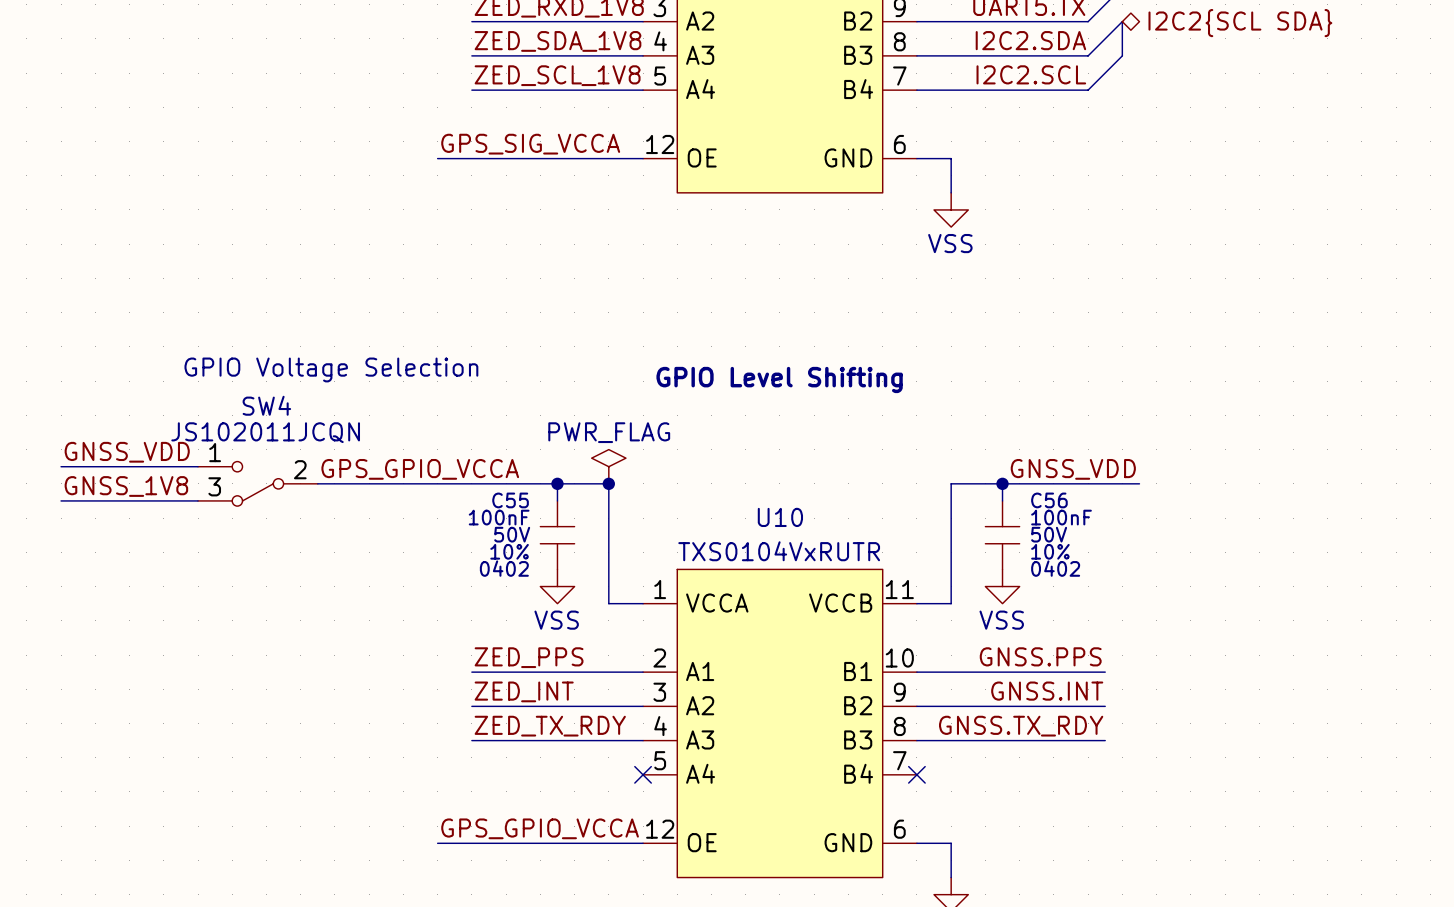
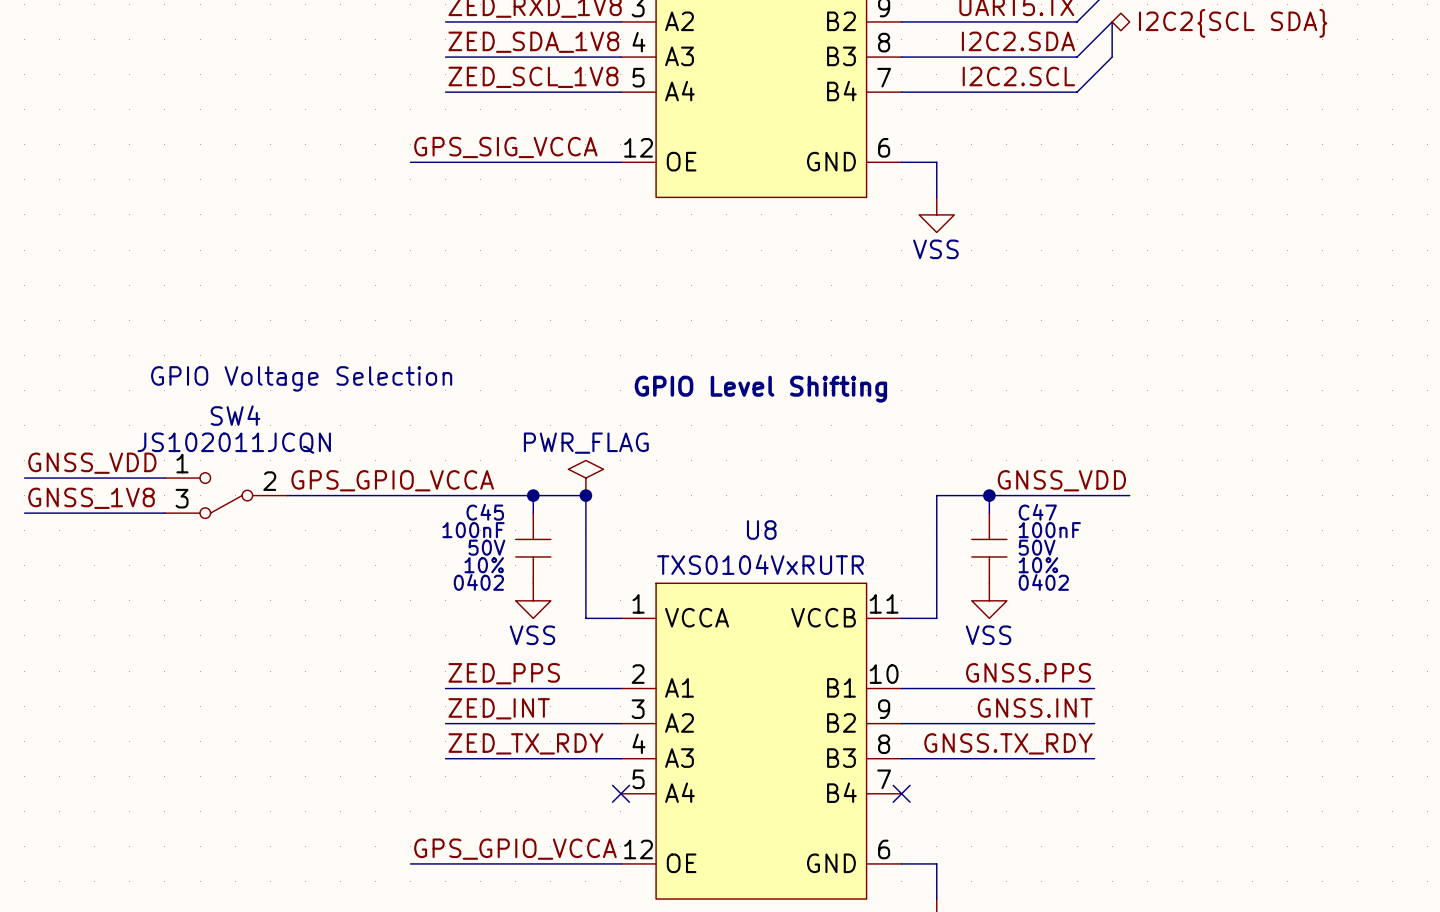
C55 name: C55 (510, 500) -> C45 (485, 512)
C56 name: C56 (1049, 500) -> C47 (1037, 512)
U10 name: U10 (780, 517) -> U8 (761, 530)

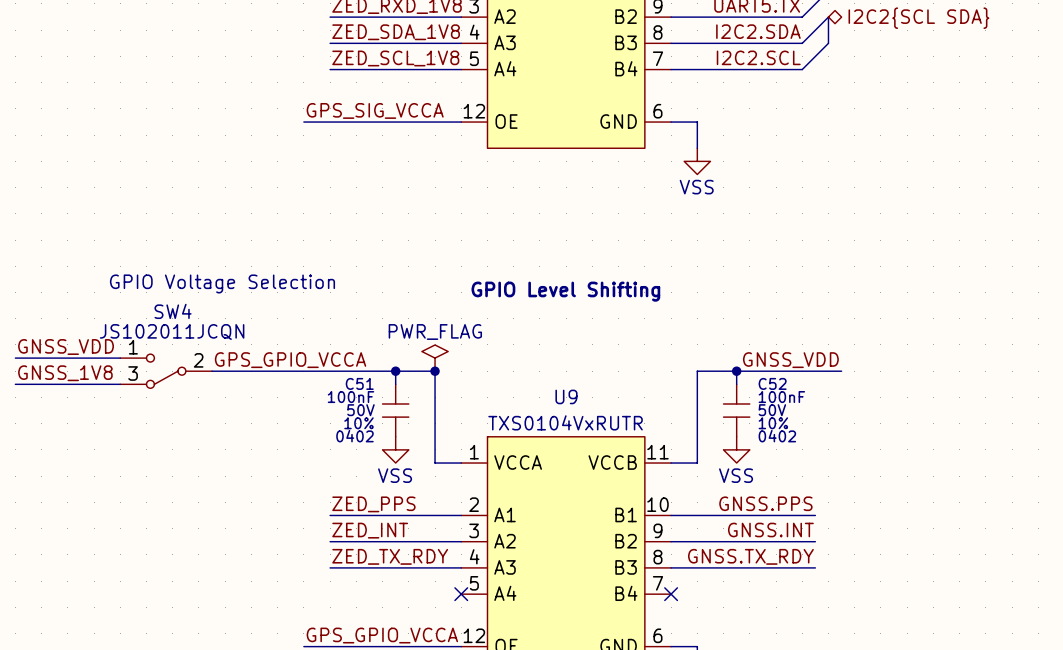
C45 name: C45 (485, 512) -> C51 (359, 383)
C47 name: C47 (1037, 512) -> C52 (772, 383)
U8 name: U8 (761, 530) -> U9 (566, 396)

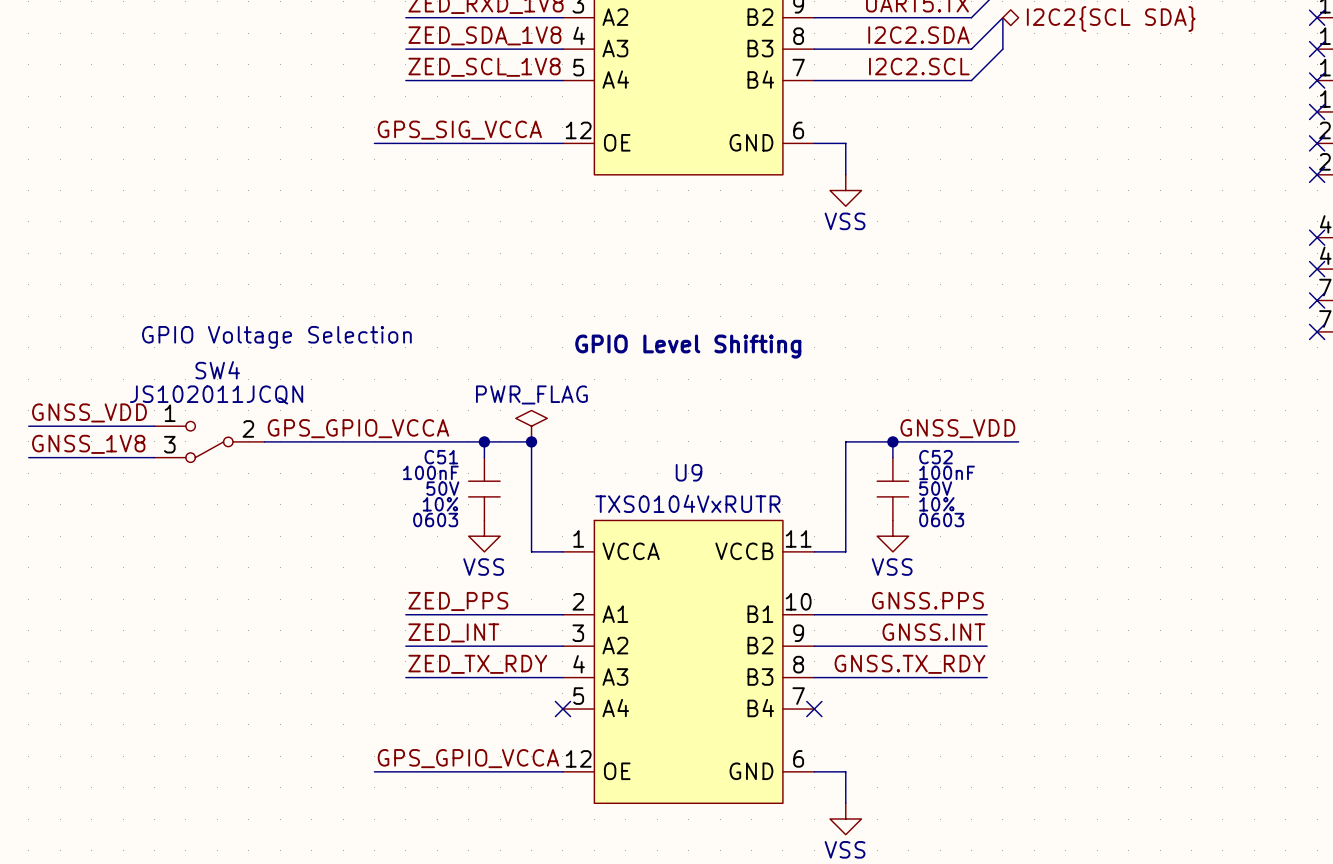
C51 text: 0402 (354, 436) -> 0603 (435, 520)
C52 text: 0402 (777, 436) -> 0603 (941, 520)

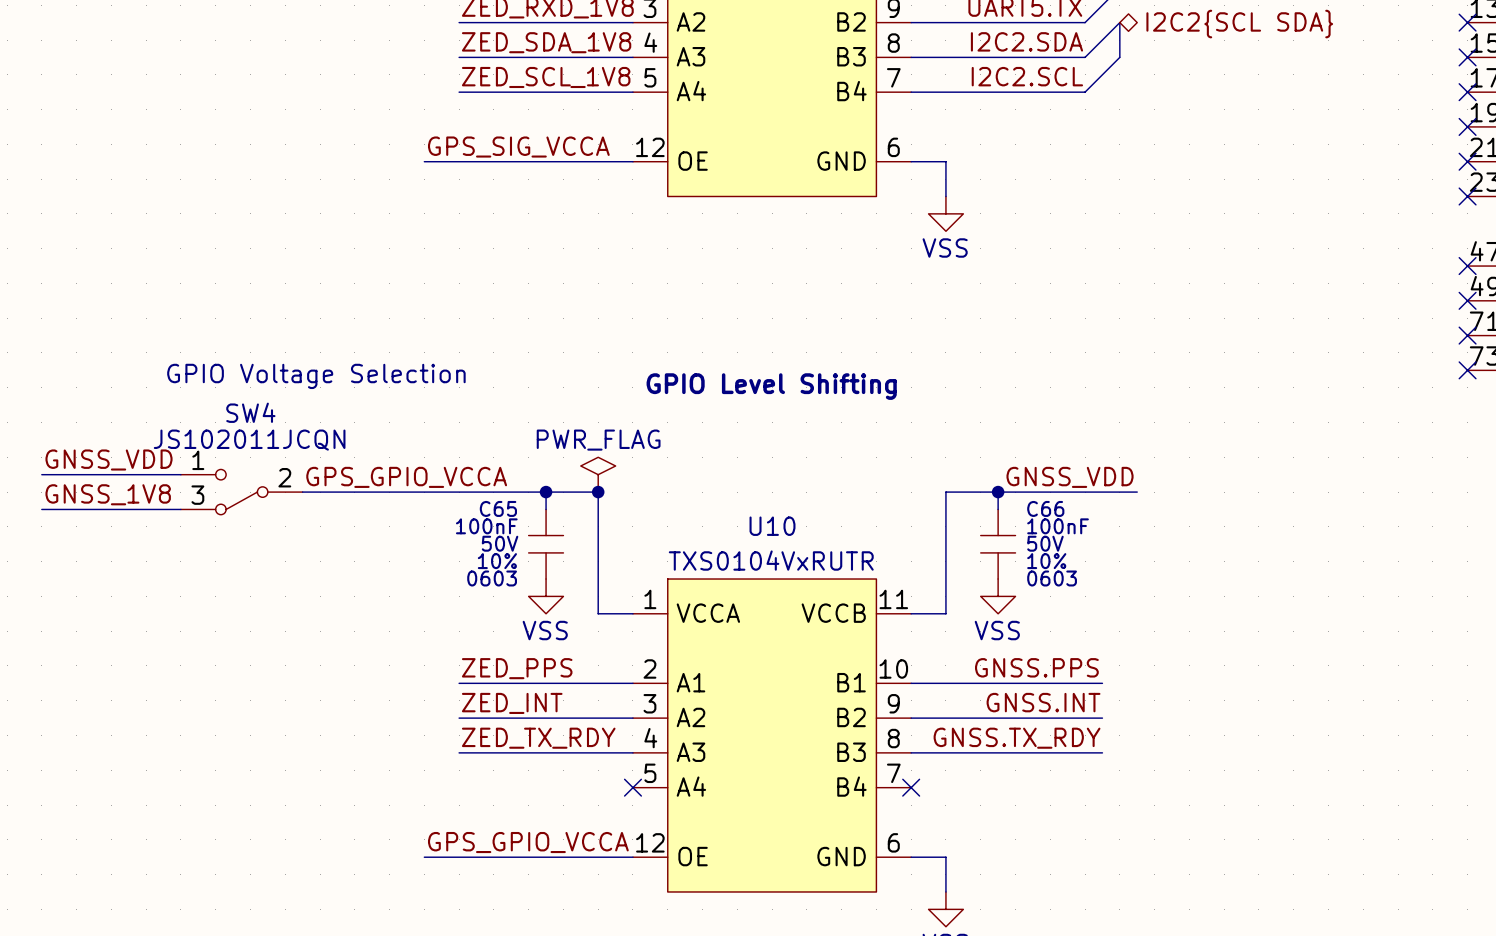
C51 name: C51 (441, 457) -> C65 (498, 508)
C52 name: C52 (935, 457) -> C66 (1045, 508)
U9 name: U9 (689, 472) -> U10 (772, 526)

